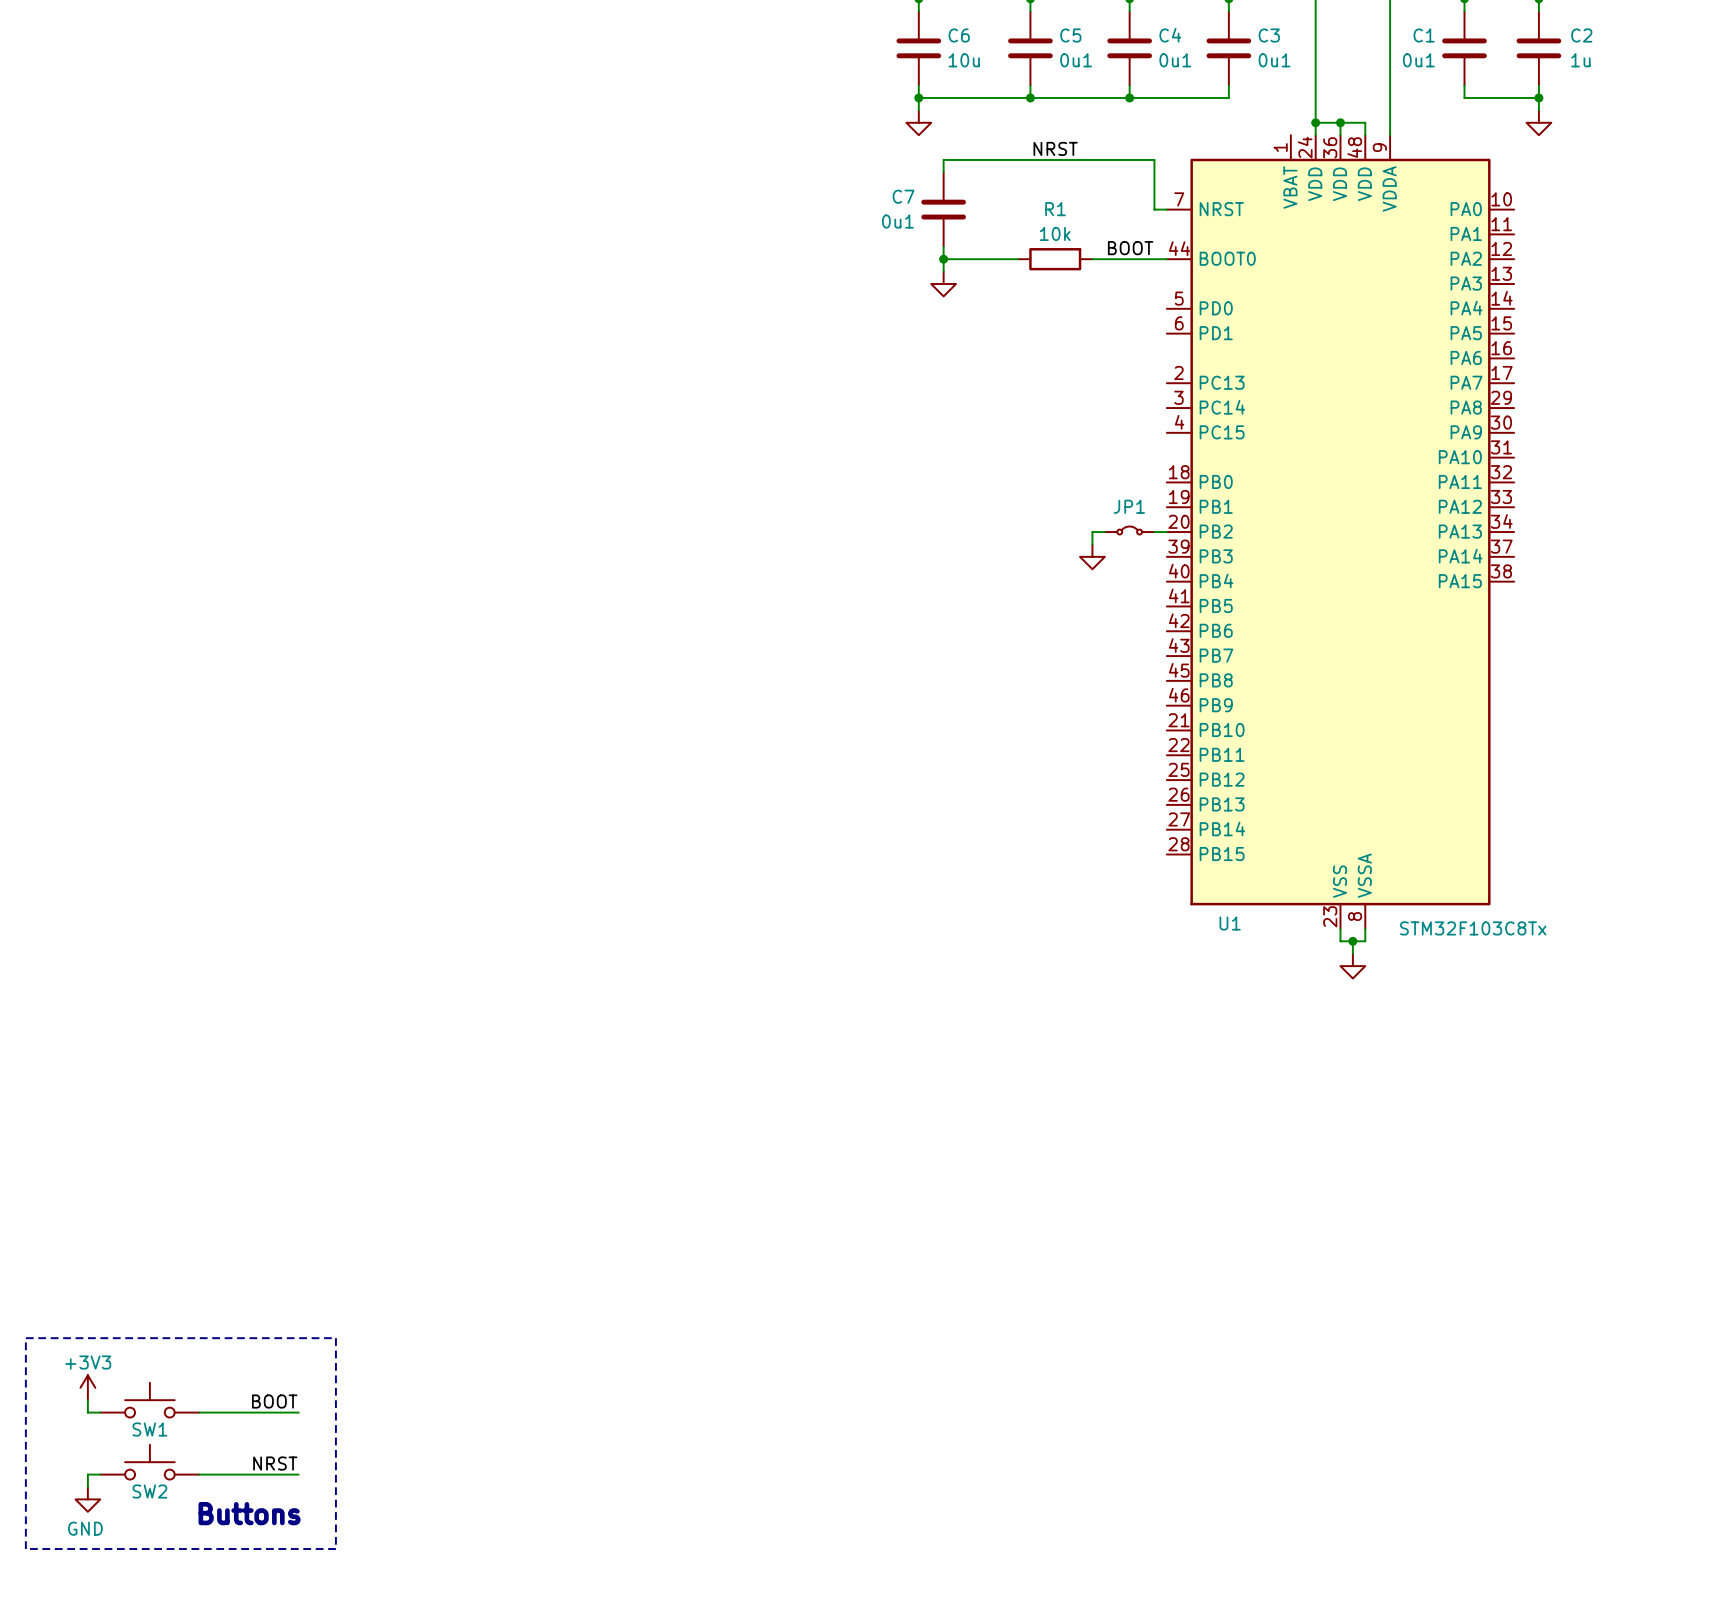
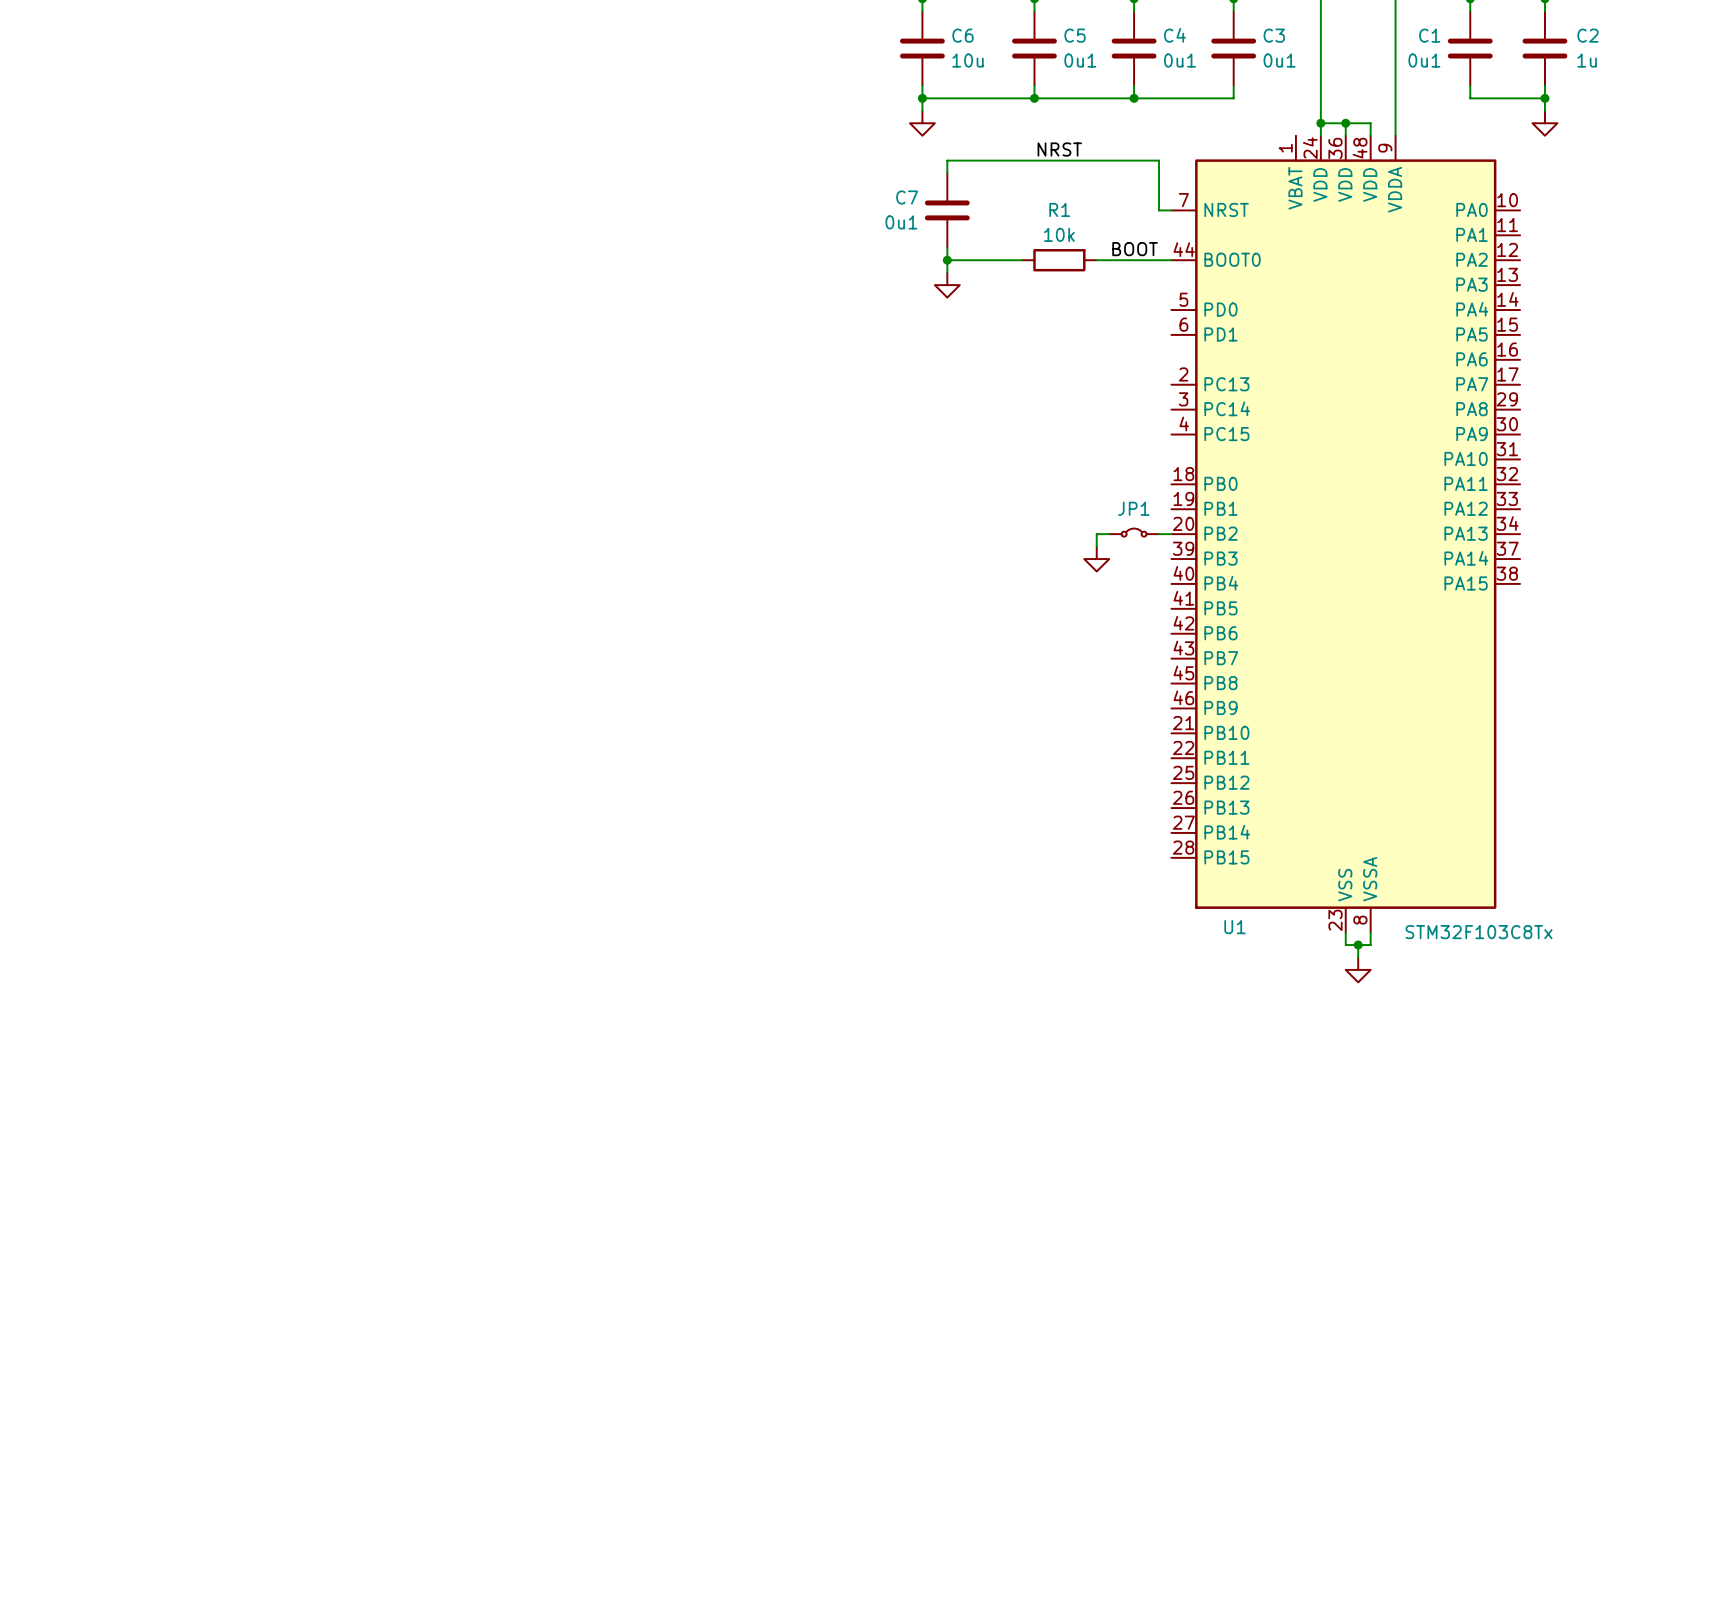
line: (25, 1338) (335, 1338) (335, 1549) (25, 1549) (25, 1338) -> none
power symbol: +3V3 (87, 1387) -> none
wire: (87, 1400) (87, 1412) (100, 1412) -> none
SW1: (149, 1400) -> none
label: BOOT (274, 1401) -> none
wire: (199, 1412) (298, 1412) -> none
SW2: (149, 1462) -> none
label: NRST (275, 1463) -> none
wire: (100, 1474) (87, 1474) (87, 1486) -> none
wire: (199, 1474) (298, 1474) -> none
power symbol: GND (87, 1499) -> none
text: Buttons (249, 1513) -> none

